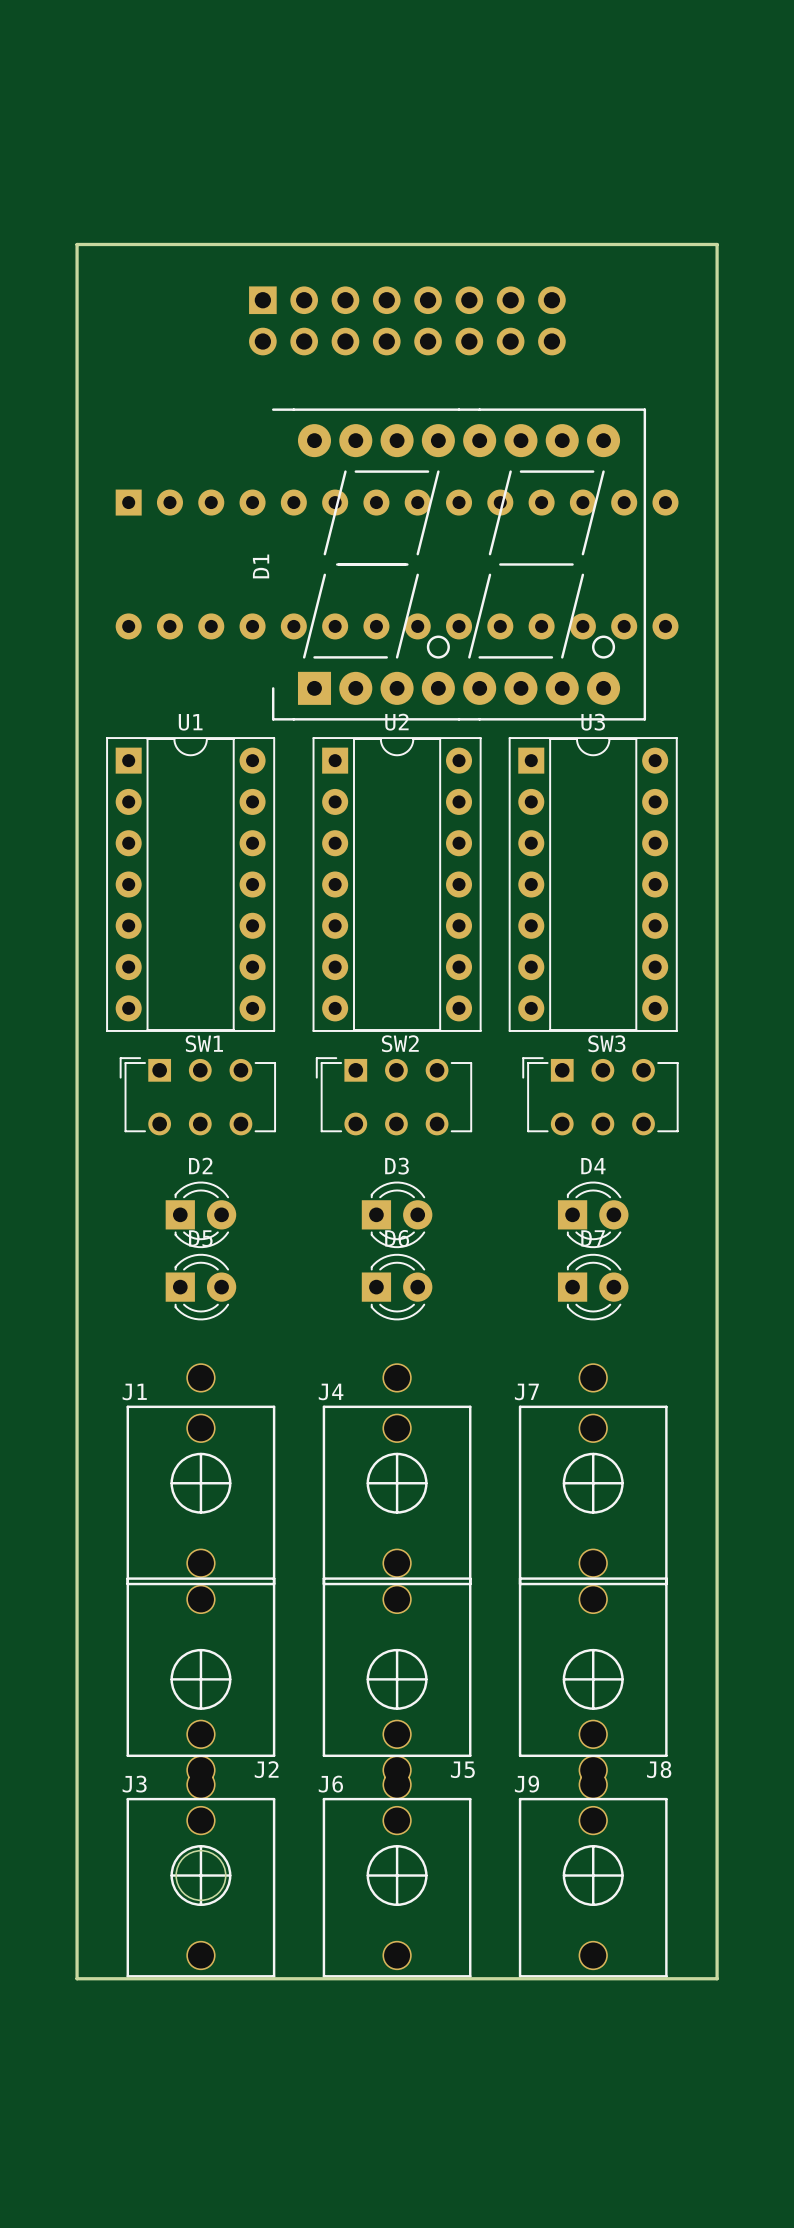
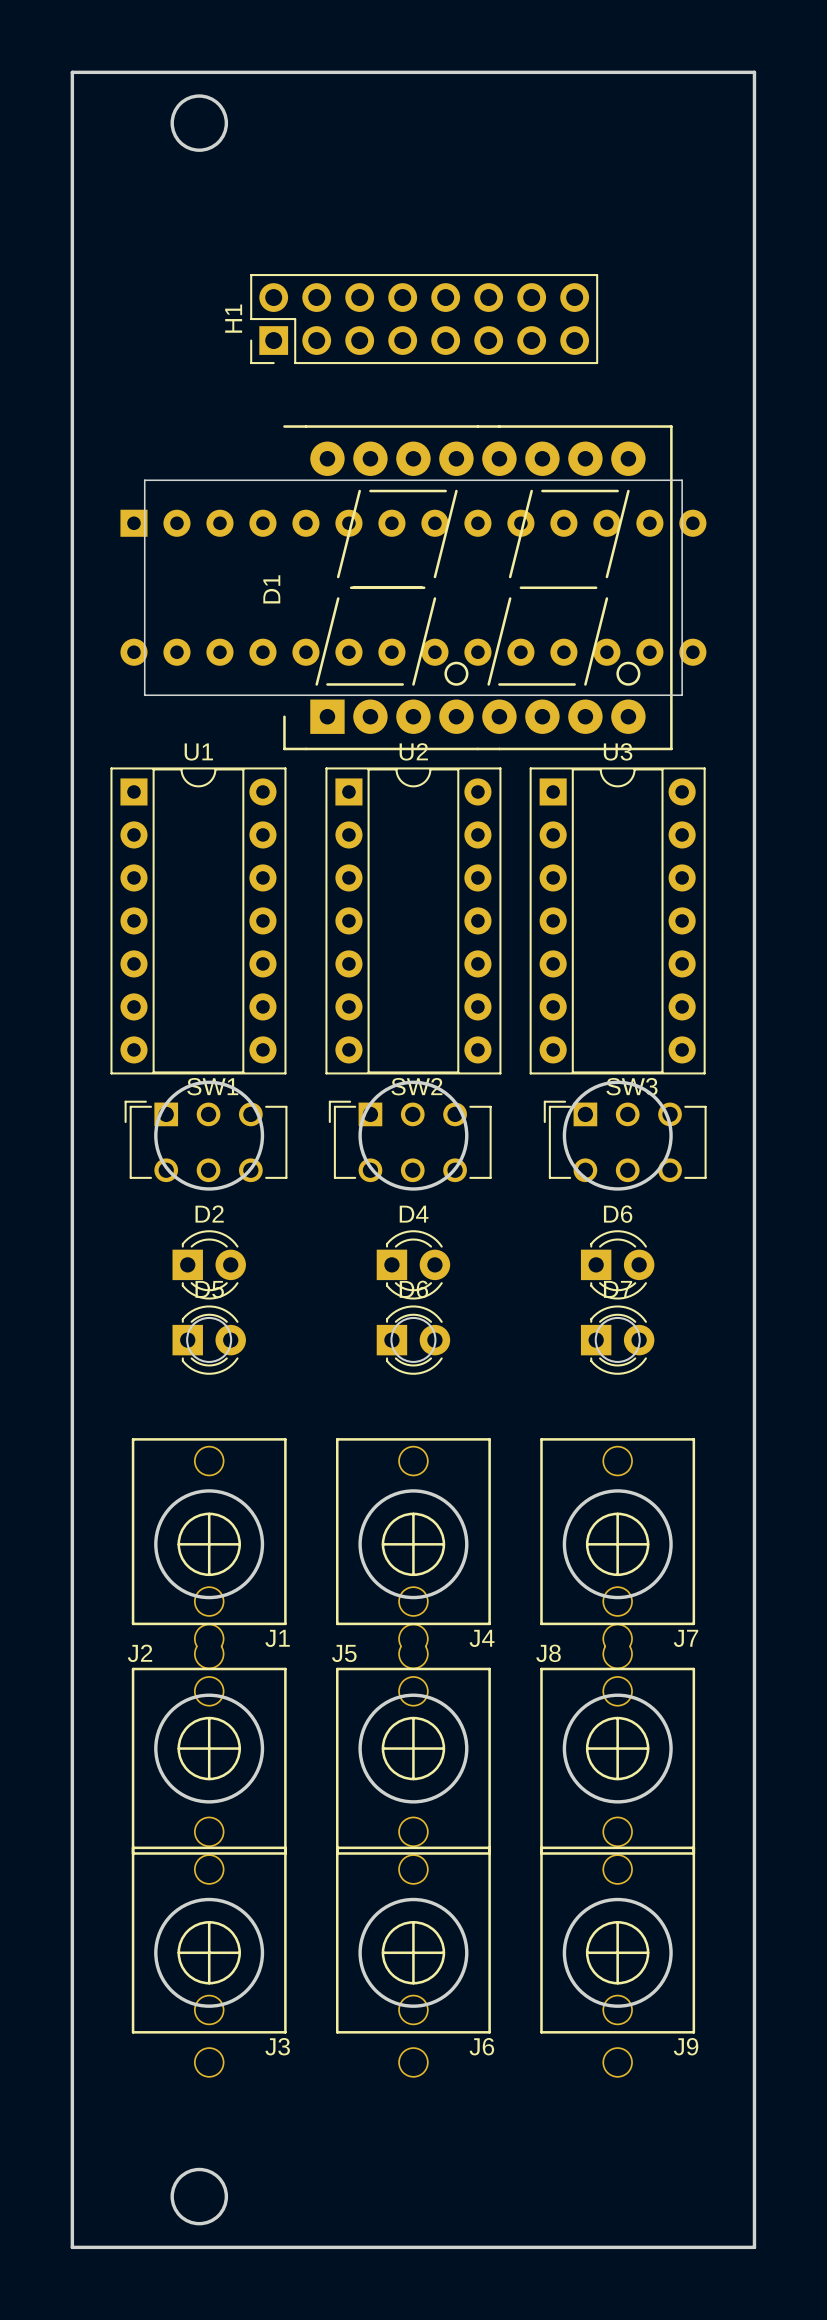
round board edge: none -> [170, 94, 229, 152]
board edge: (77, 244) (717, 244) (717, 1978) (77, 1978) (77, 244) -> (72, 72) (72, 2247) (754, 2247) (754, 72) (72, 72)
H1 side: bottom (407, 320) -> top (424, 319)
board edge: none -> (144, 480) (682, 480) (682, 695) (144, 695) (144, 480)
round board edge: none -> [154, 1080, 265, 1191]
round board edge: none -> [358, 1080, 469, 1191]
round board edge: none -> [562, 1080, 673, 1191]
D3 name: D3 (396, 1166) -> D4 (414, 1214)
D4 name: D4 (593, 1166) -> D6 (618, 1214)
round board edge: none -> [186, 1316, 233, 1363]
round board edge: none -> [390, 1316, 437, 1363]
round board edge: none -> [594, 1316, 641, 1363]
round board edge: none -> [154, 1489, 265, 1600]
round board edge: none -> [358, 1489, 469, 1600]
round board edge: none -> [562, 1489, 673, 1600]
J1 rotation: 0° (200, 1474) -> 180° (209, 1553)
J4 rotation: 0° (397, 1474) -> 180° (413, 1553)
J7 rotation: 0° (593, 1474) -> 180° (617, 1553)
round board edge: none -> [154, 1693, 265, 1804]
round board edge: none -> [358, 1693, 469, 1804]
round board edge: none -> [562, 1693, 673, 1804]
J2 rotation: 0° (200, 1688) -> 180° (209, 1739)
J5 rotation: 0° (397, 1688) -> 180° (413, 1739)
J8 rotation: 0° (593, 1688) -> 180° (617, 1739)
round board edge: none -> [358, 1897, 469, 2008]
round board edge: none -> [562, 1897, 673, 2008]
round board edge size: [175, 1850, 227, 1901] -> [154, 1897, 265, 2008]
J3 rotation: 0° (200, 1866) -> 180° (209, 1962)
J6 rotation: 0° (397, 1866) -> 180° (413, 1962)
J9 rotation: 0° (593, 1866) -> 180° (617, 1962)
round board edge: none -> [170, 2167, 229, 2226]

